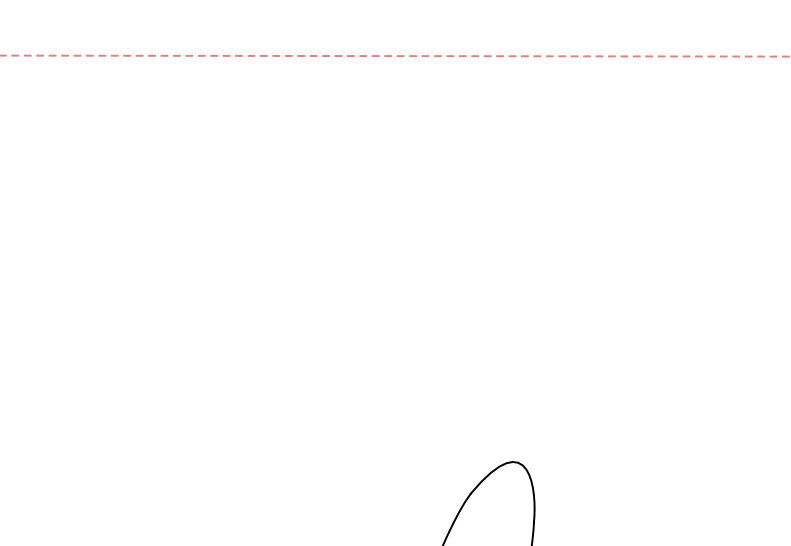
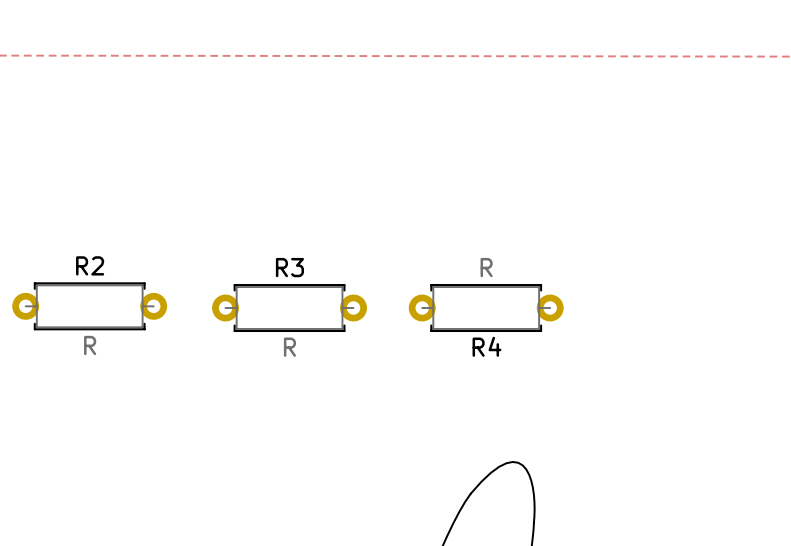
R2: none -> R (89, 306)
R3: none -> R (289, 308)
R4: none -> R (486, 308)

